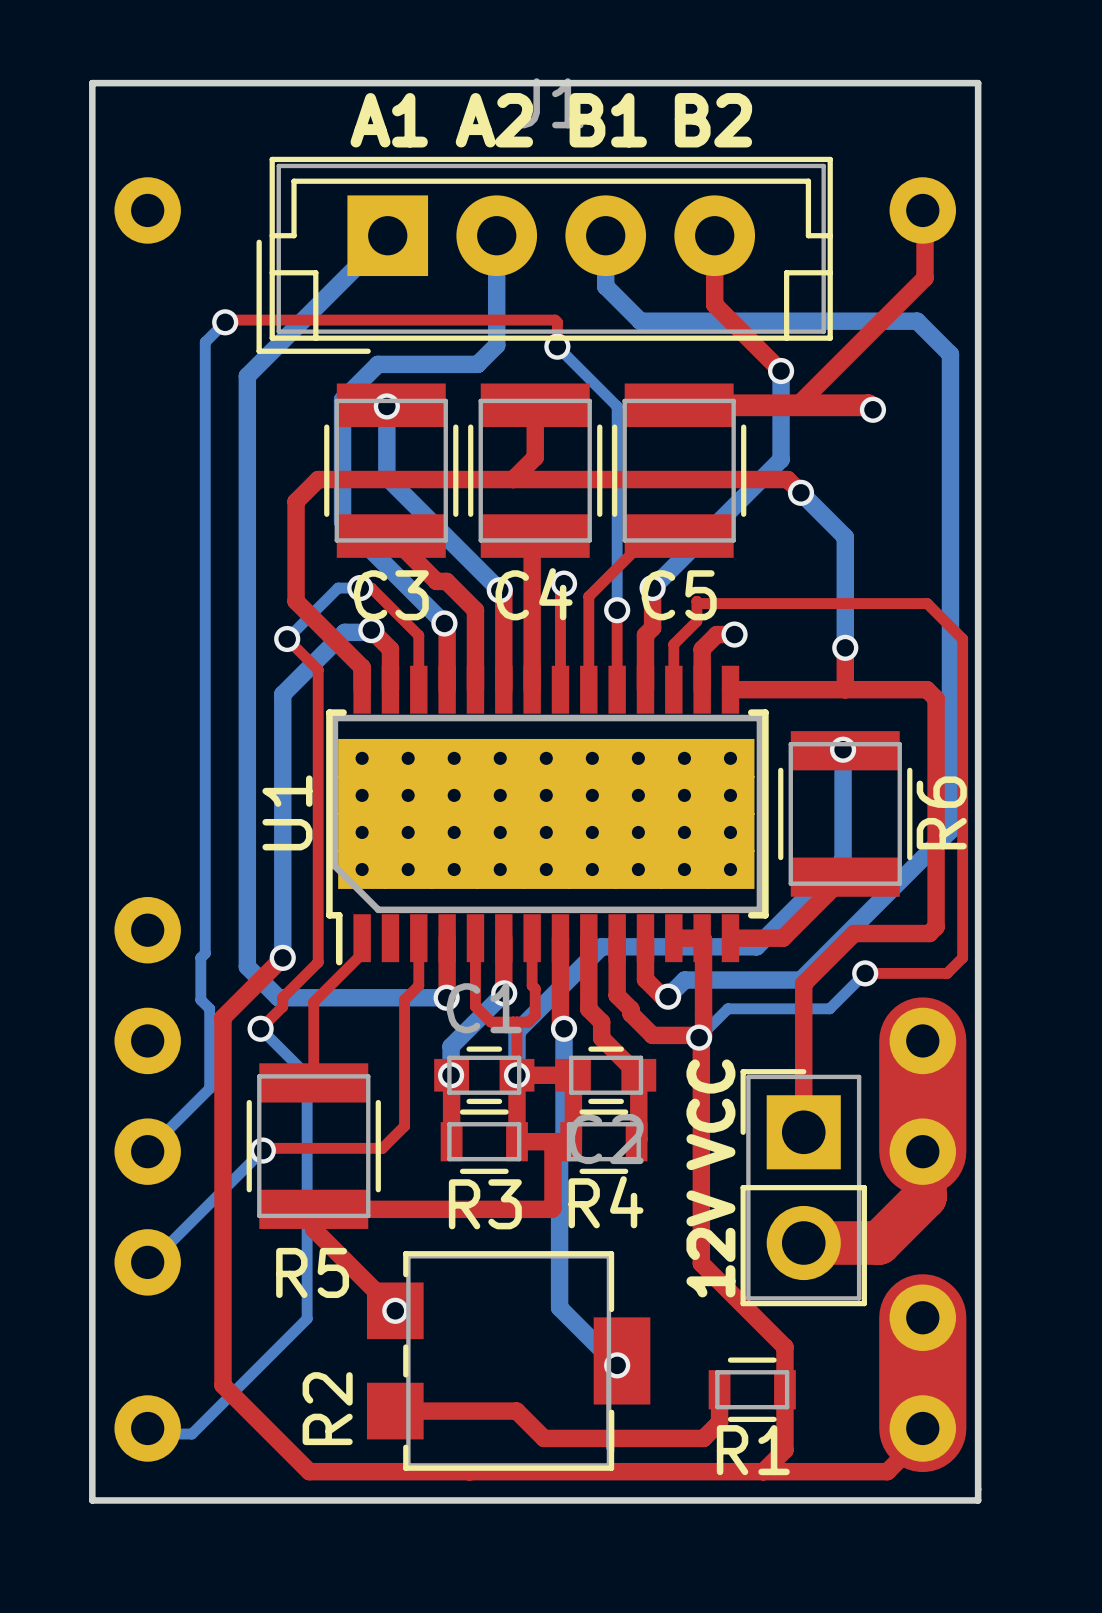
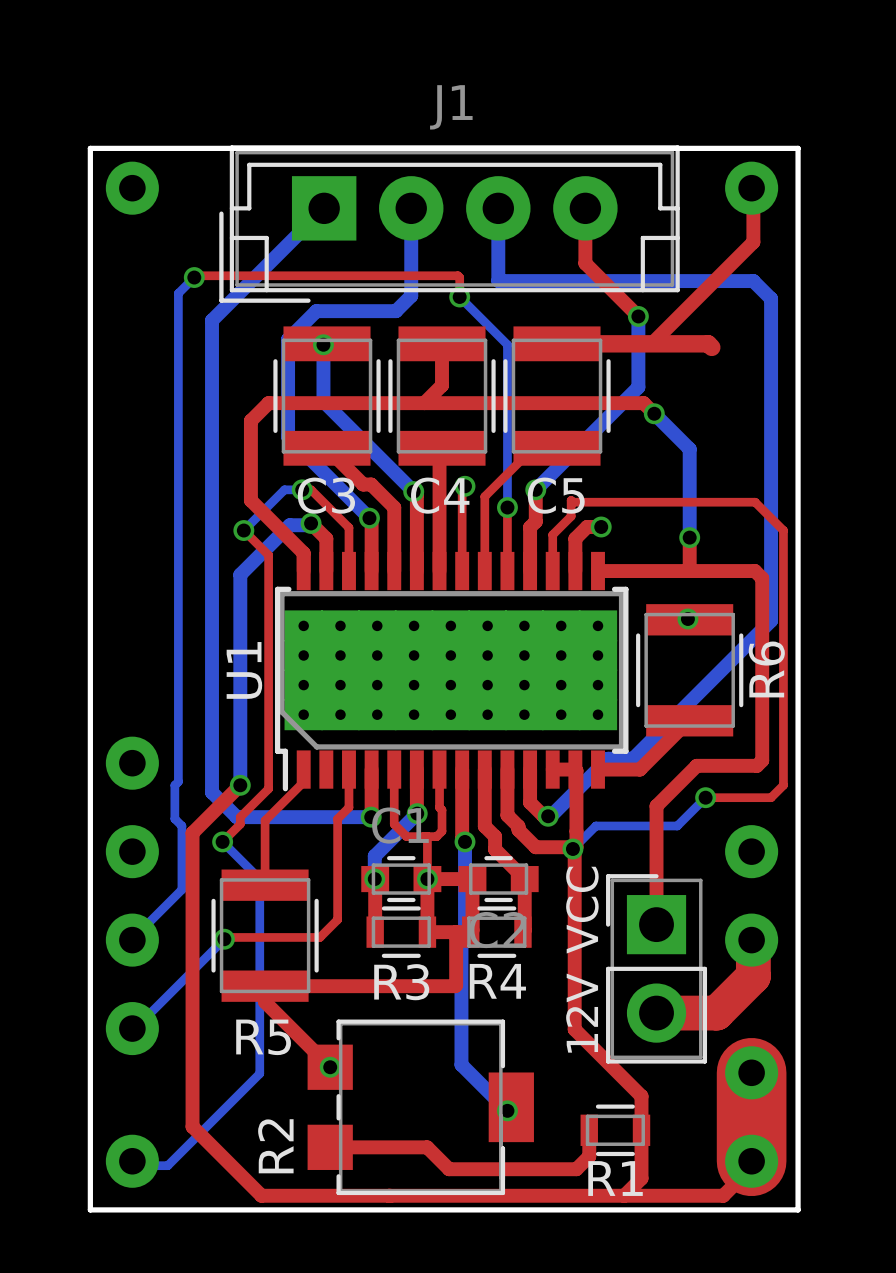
board edge: (92, 83) (92, 1500) (978, 1500) (978, 83) (92, 83) -> (90, 148) (90, 1209) (798, 1209) (798, 148) (90, 148)
text: A1 (389, 120) -> none
text: A2 (494, 120) -> none
text: B1 (608, 120) -> none
text: B2 (713, 120) -> none
bottom track: (605, 286) (640, 321) (917, 321) (950, 354) (950, 830) (800, 980) (684, 980) (668, 996) -> (498, 248) (498, 280)
bottom track: none -> (498, 281) (753, 281) (771, 298) (771, 620) (633, 758) (608, 758) (549, 817)
via: (872, 409) -> none
bottom track: (843, 749) (843, 860) (756, 946) (601, 946) (516, 1031) (516, 1075) -> none
top track: (922, 1040) (922, 1151) -> none

